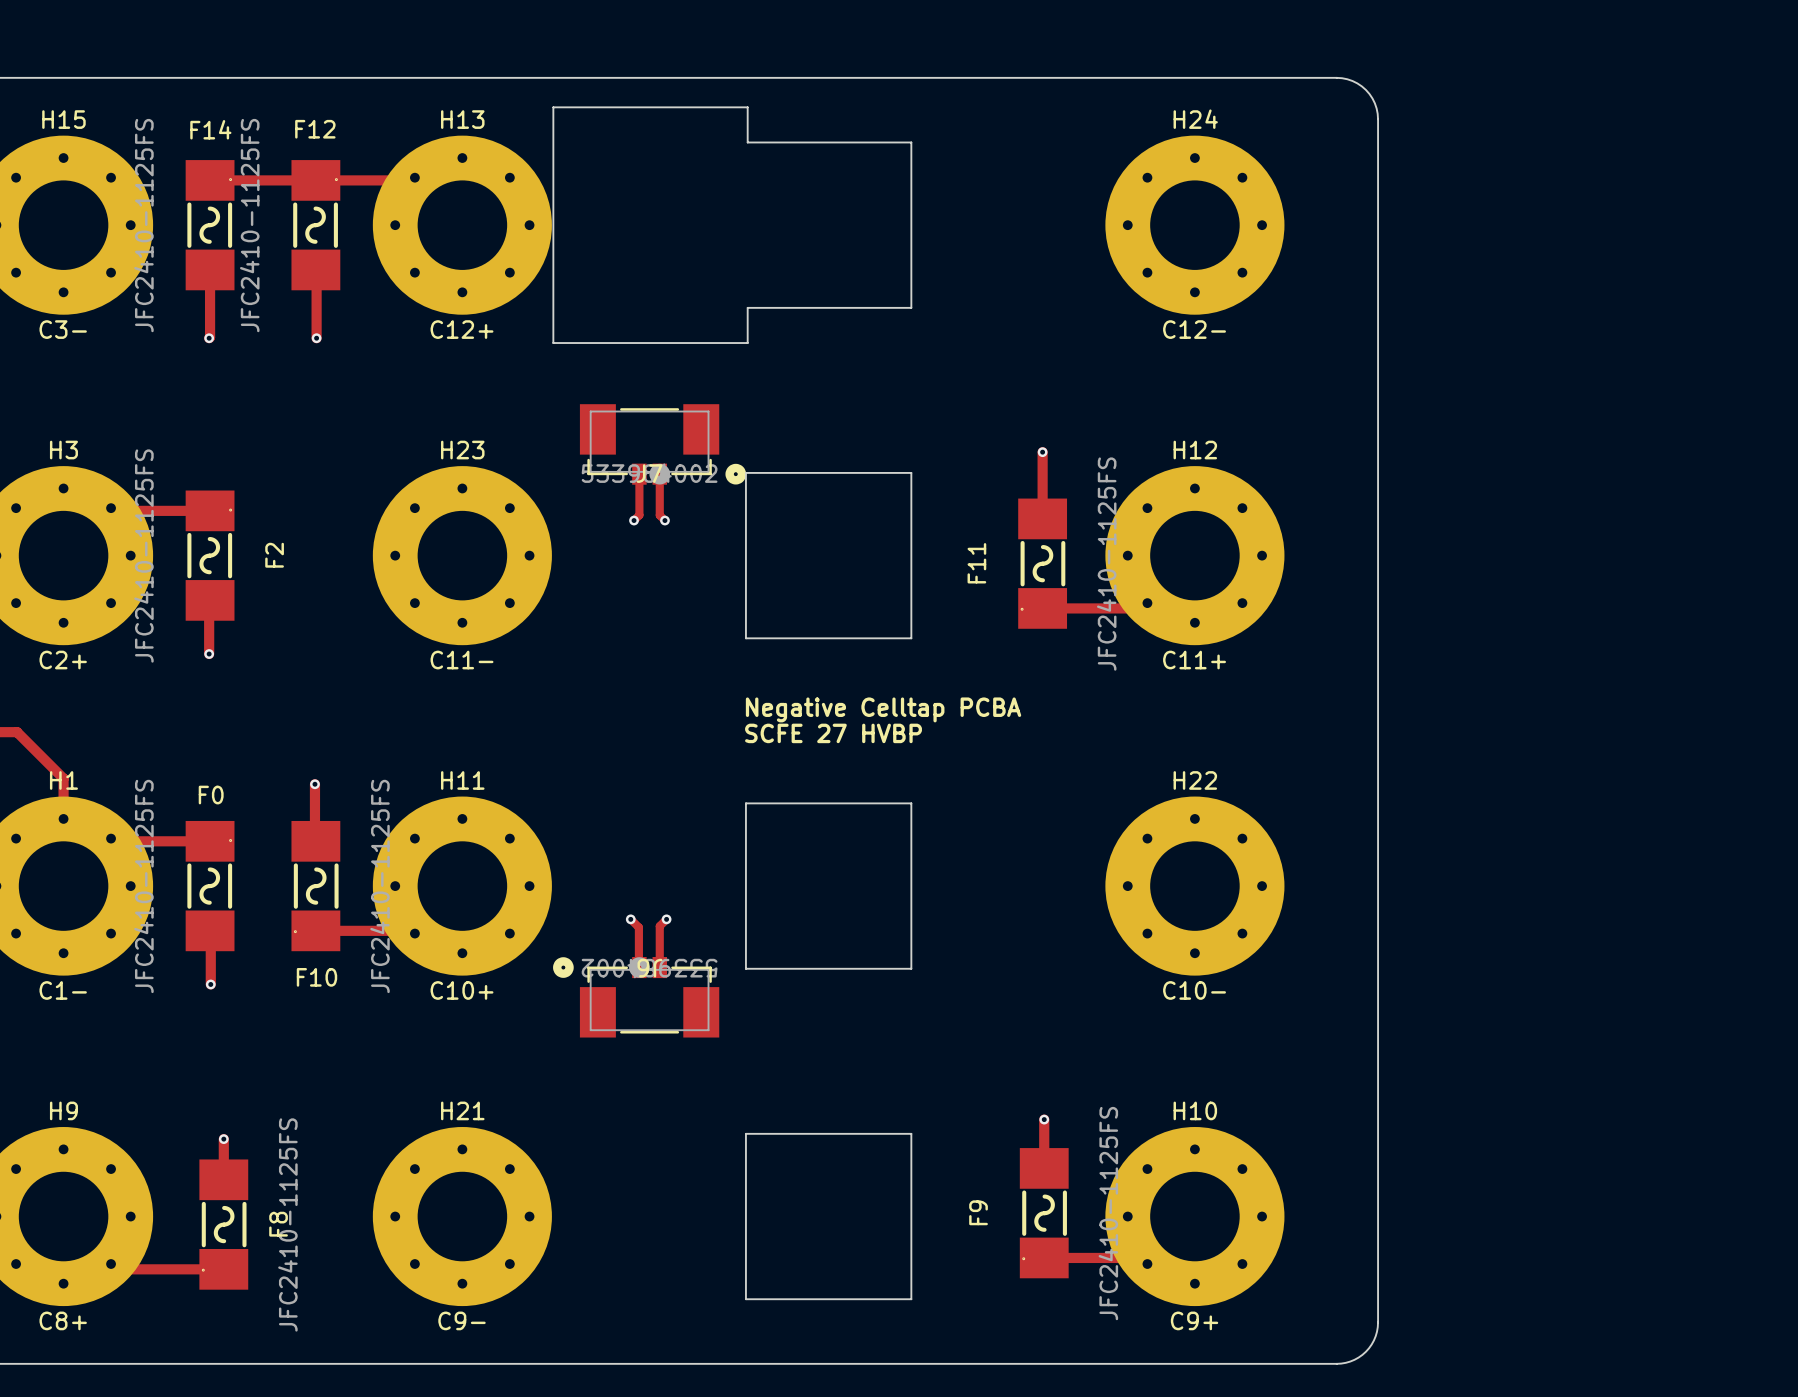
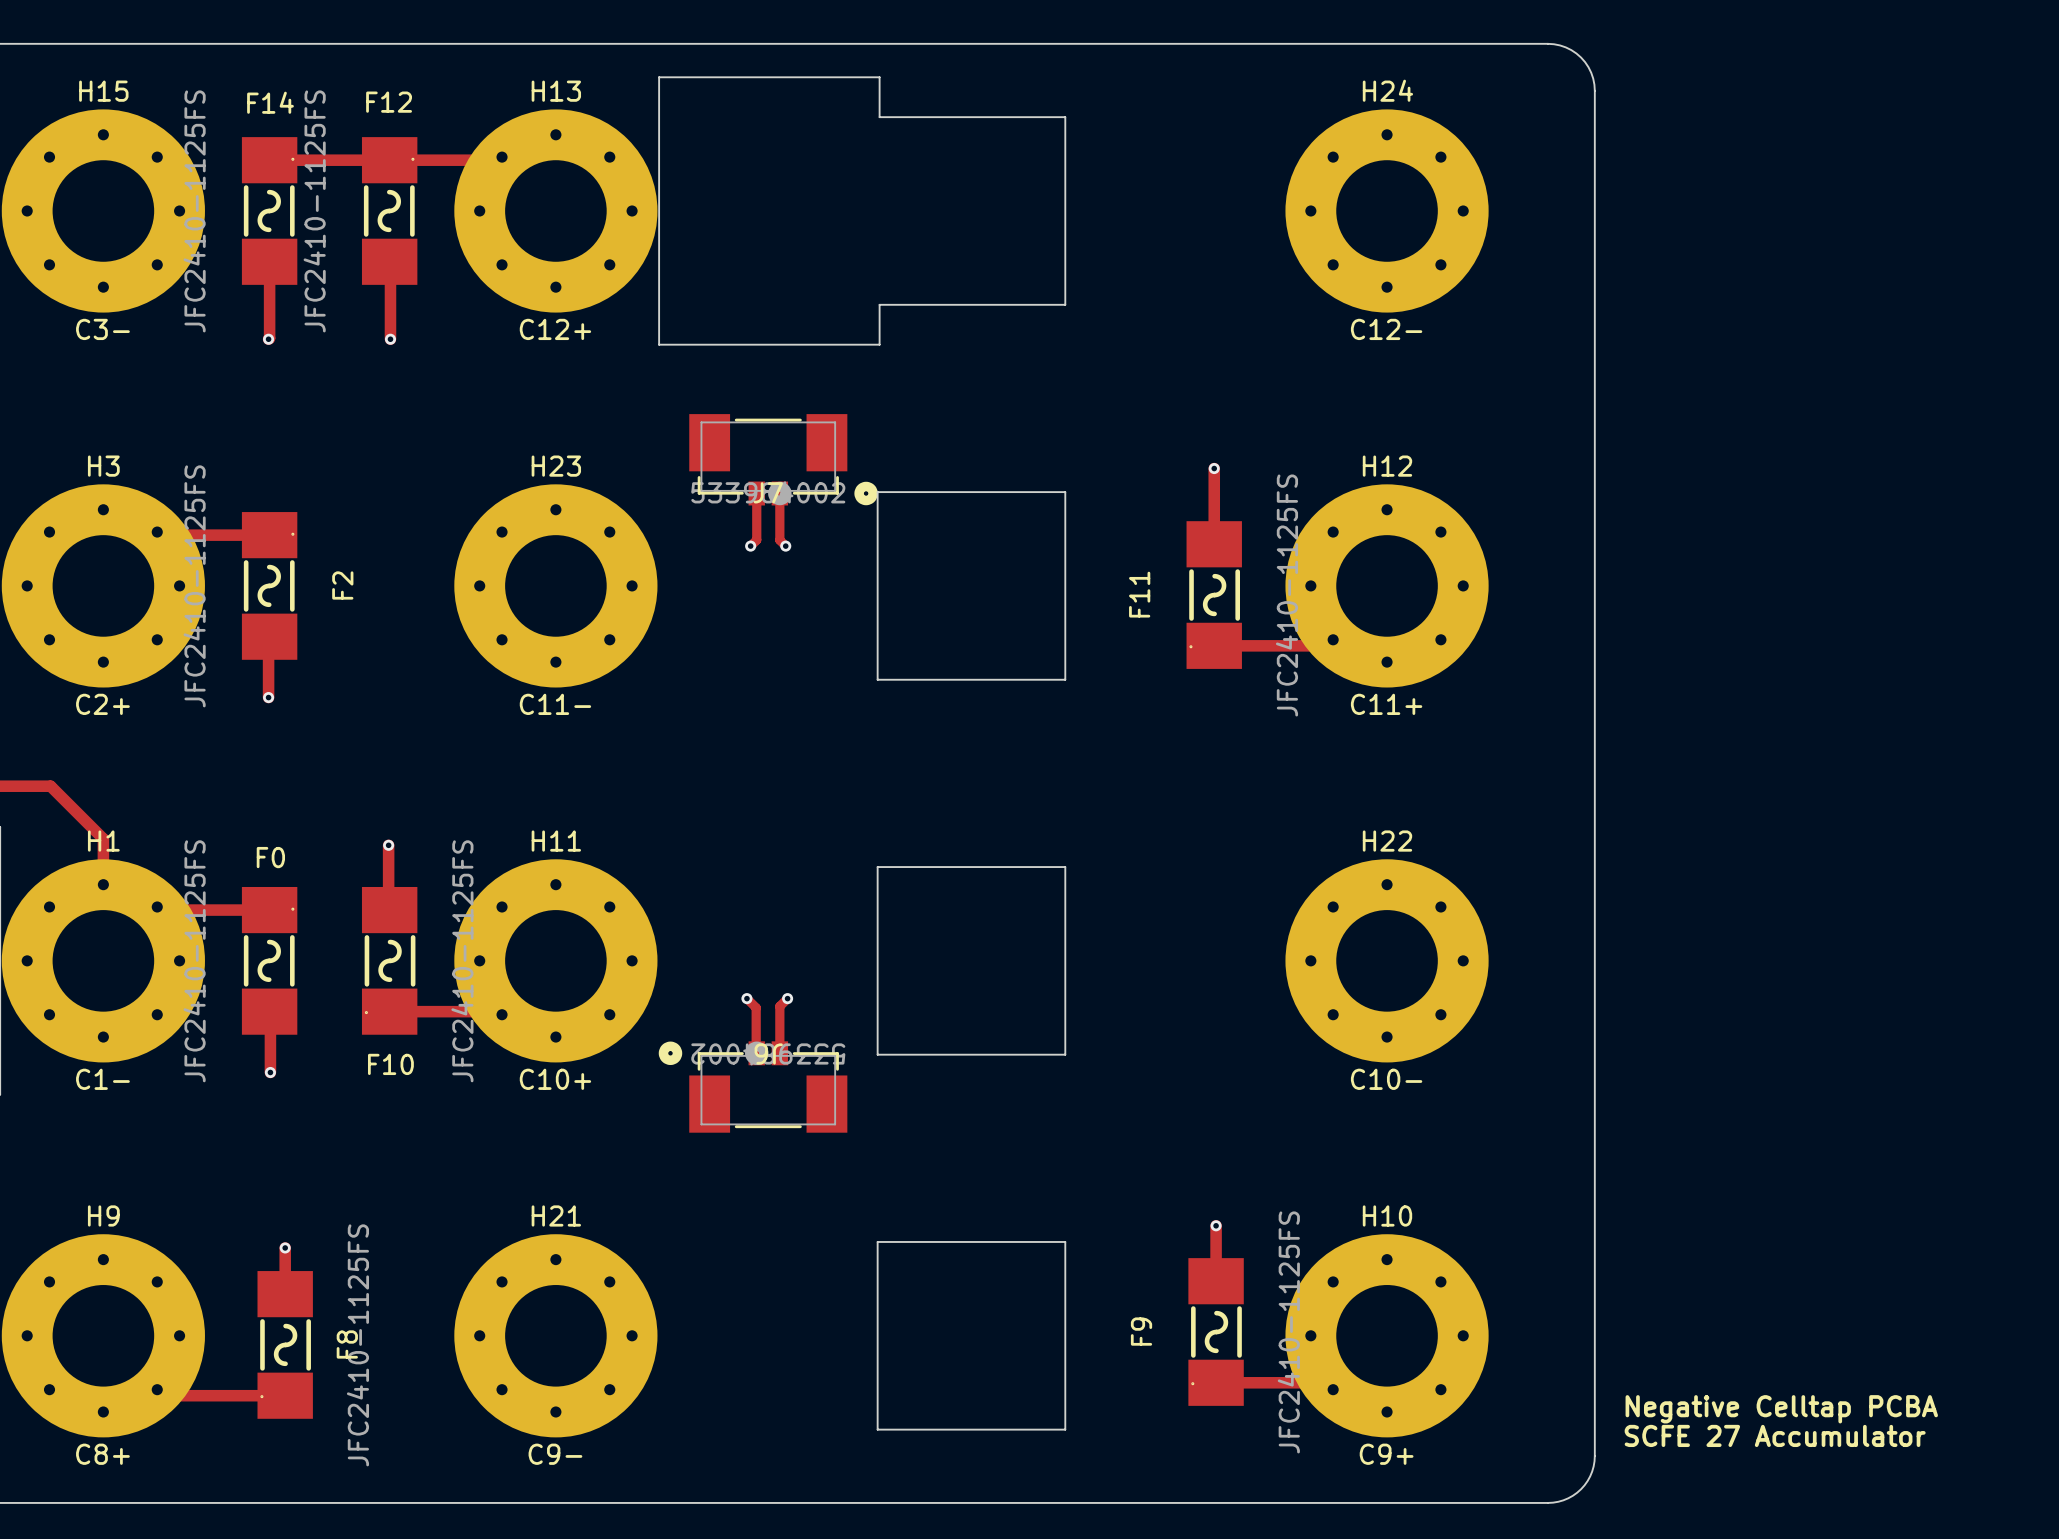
text: Negative Celltap PCBA (883, 709) -> none
text: SCFE 27 HVBP (833, 733) -> none
text: none -> Negative Celltap PCBA (1781, 1409)
text: none -> SCFE 27 Accumulator (1775, 1435)

